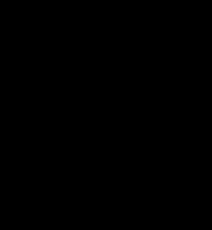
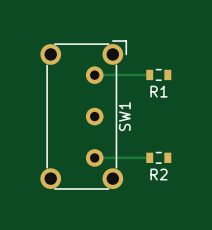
track: none -> (149, 74) (94, 75)
R1: none -> (158, 74)
SW1: none -> (83, 115)
track: none -> (94, 157) (149, 157)
R2: none -> (158, 157)

